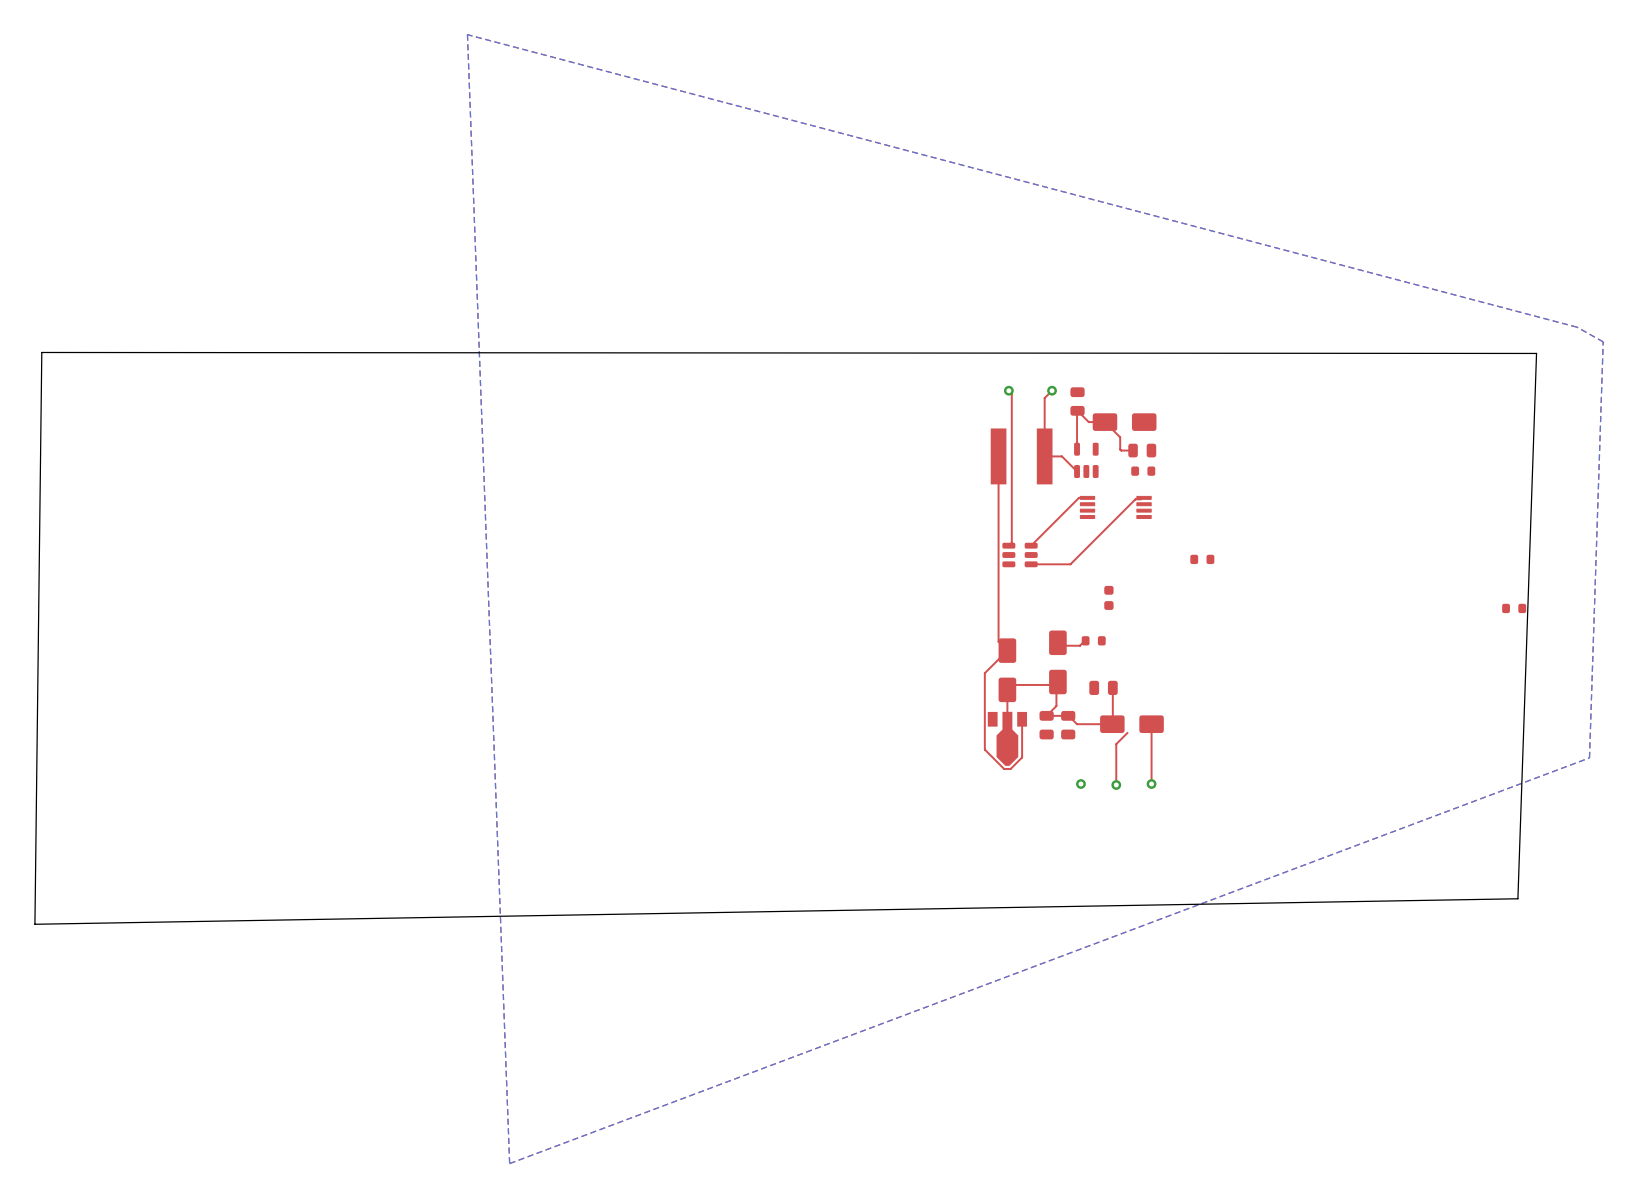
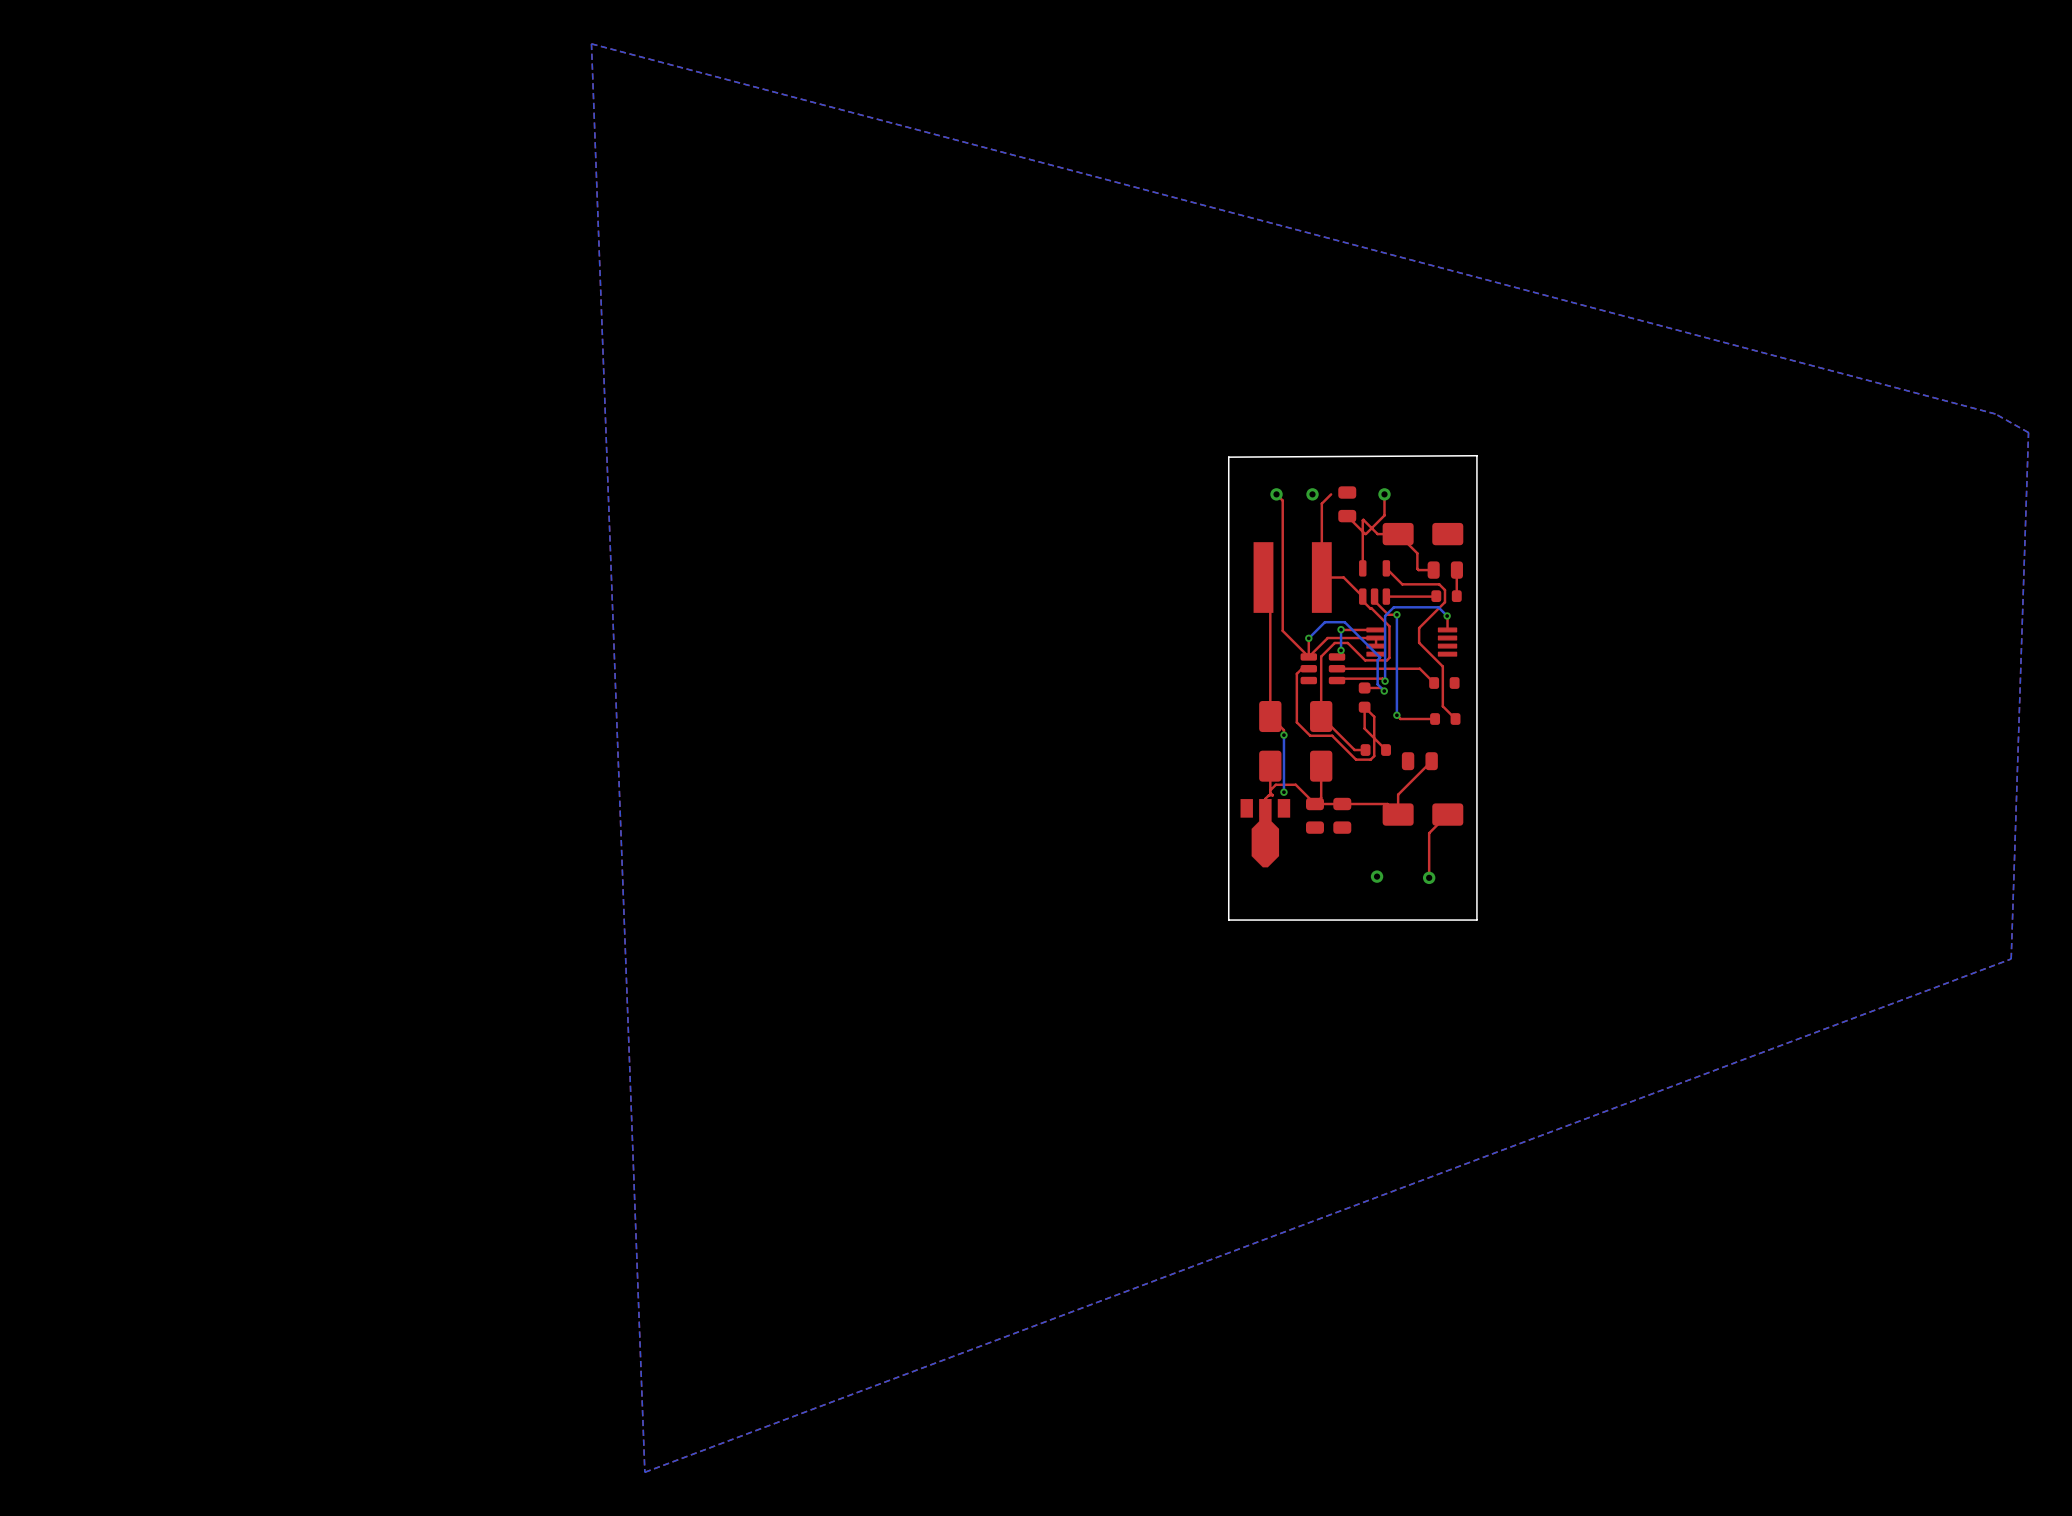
board edge: (41, 352) (1536, 353) (1517, 898) (34, 924) (41, 352) -> none
board edge: none -> (1476, 455) (1476, 920) (1228, 920) (1228, 457) (1476, 455)
part position: (1052, 390) -> (1312, 494)
top track: none -> (1384, 494) (1384, 515) (1365, 534)
part: none -> (1384, 494)
top track: (1011, 393) (1011, 542) (1008, 545) -> (1280, 498) (1282, 500) (1282, 630) (1308, 656)
part position: (1077, 401) -> (1347, 504)
top track: none -> (1347, 516) (1365, 534)
top track: none -> (1386, 568) (1402, 584) (1439, 584) (1444, 590) (1444, 602) (1419, 628) (1419, 642) (1442, 666) (1442, 706) (1455, 719)
top track: none -> (1456, 570) (1456, 596)
top track: (998, 456) (998, 641) (1007, 650) -> (1263, 577) (1270, 584) (1270, 716) (1283, 730) (1283, 735)
top track: none -> (1362, 596) (1362, 600) (1389, 626) (1389, 657) (1386, 660) (1365, 660) (1347, 642) (1334, 642) (1321, 656) (1321, 716) (1354, 750) (1365, 750)
top track: none -> (1374, 596) (1374, 600) (1388, 614) (1396, 614)
top track: none -> (1435, 596) (1386, 596)
bottom track: none -> (1396, 614) (1396, 717)
via: none -> (1396, 614)
top track: none -> (1447, 615) (1447, 629)
bottom track: none -> (1447, 615) (1438, 607) (1393, 607) (1385, 616) (1385, 681)
via: none -> (1447, 615)
bottom track: none -> (1341, 629) (1341, 650)
via: none -> (1341, 629)
top track: (1078, 497) (1031, 545) -> (1365, 629) (1341, 629)
top track: (1141, 499) (1135, 499) (1070, 564) (1031, 564) -> none
top track: none -> (1308, 638) (1308, 656)
bottom track: none -> (1308, 638) (1324, 622) (1344, 622) (1380, 657) (1377, 660) (1377, 684) (1384, 691)
via: none -> (1308, 638)
top track: none -> (1376, 646) (1376, 638) (1327, 638) (1308, 656)
via: none -> (1341, 650)
top track: none -> (1308, 668) (1301, 668) (1296, 673) (1296, 722) (1310, 735) (1332, 735) (1356, 759) (1370, 759) (1374, 756) (1374, 716) (1364, 707) (1364, 728) (1386, 750)
top track: none -> (1337, 668) (1419, 668) (1434, 683)
top track: none -> (1337, 680) (1338, 678) (1382, 678) (1385, 681)
via: none -> (1385, 681)
part: none -> (1444, 683)
top track: none -> (1364, 687) (1381, 687) (1384, 691)
via: none -> (1384, 691)
part position: (1020, 555) -> (1322, 668)
part: (1202, 559) -> none
top track: none -> (1396, 715) (1400, 719) (1435, 719)
via: none -> (1396, 715)
part: none -> (1445, 719)
bottom track: none -> (1283, 735) (1283, 792)
via: none -> (1283, 735)
part: none -> (1270, 741)
part: none -> (1321, 741)
part: none -> (1375, 750)
part position: (1108, 597) -> (1364, 697)
part: none -> (1419, 761)
top track: none -> (1431, 761) (1398, 794) (1398, 814)
top track: none -> (1270, 766) (1270, 792) (1272, 795) (1268, 795) (1265, 798) (1265, 808)
top track: none -> (1321, 766) (1321, 797) (1314, 804)
part: (1514, 608) -> none
top track: none -> (1270, 790) (1275, 784) (1295, 784) (1314, 804)
via: none -> (1283, 792)
top track: none -> (1314, 804) (1387, 804) (1398, 814)
top track: (1085, 640) (1079, 645) (1056, 645) (1052, 641) -> none
part: (1093, 640) -> none
part: none -> (1422, 814)
top track: none -> (1447, 814) (1429, 833) (1429, 877)
part: none -> (1314, 815)
part: none -> (1342, 815)
top track: (1007, 650) (984, 673) (984, 749) (1004, 768) (1010, 768) (1022, 757) (1022, 719) -> none
part: (1057, 662) -> none
part: (1007, 670) -> none
part: (1103, 687) -> none
top track: (1112, 687) (1112, 724) (1077, 724) (1068, 715) (1046, 715) (1056, 706) (1056, 684) (1012, 684) (1007, 689) (1007, 719) -> none
part: none -> (1377, 876)
part: none -> (1429, 877)
part: (1131, 724) -> none
top track: (1151, 724) (1151, 784) -> none
part: (1046, 725) -> none
part: (1068, 725) -> none
top track: (1127, 732) (1116, 744) (1116, 785) -> none
part position: (1007, 738) -> (1265, 833)
part: (1080, 784) -> none
part: (1151, 784) -> none
part: (1116, 785) -> none

